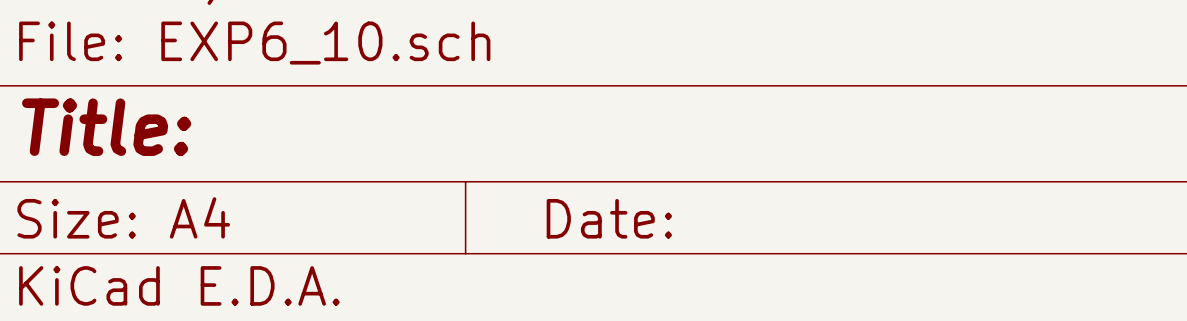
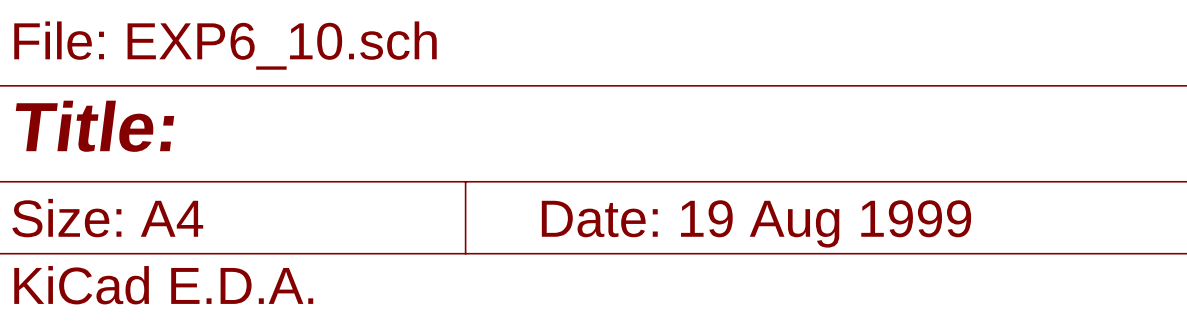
title block: Date: (609, 218) -> Date: 19 Aug 1999 (756, 223)

